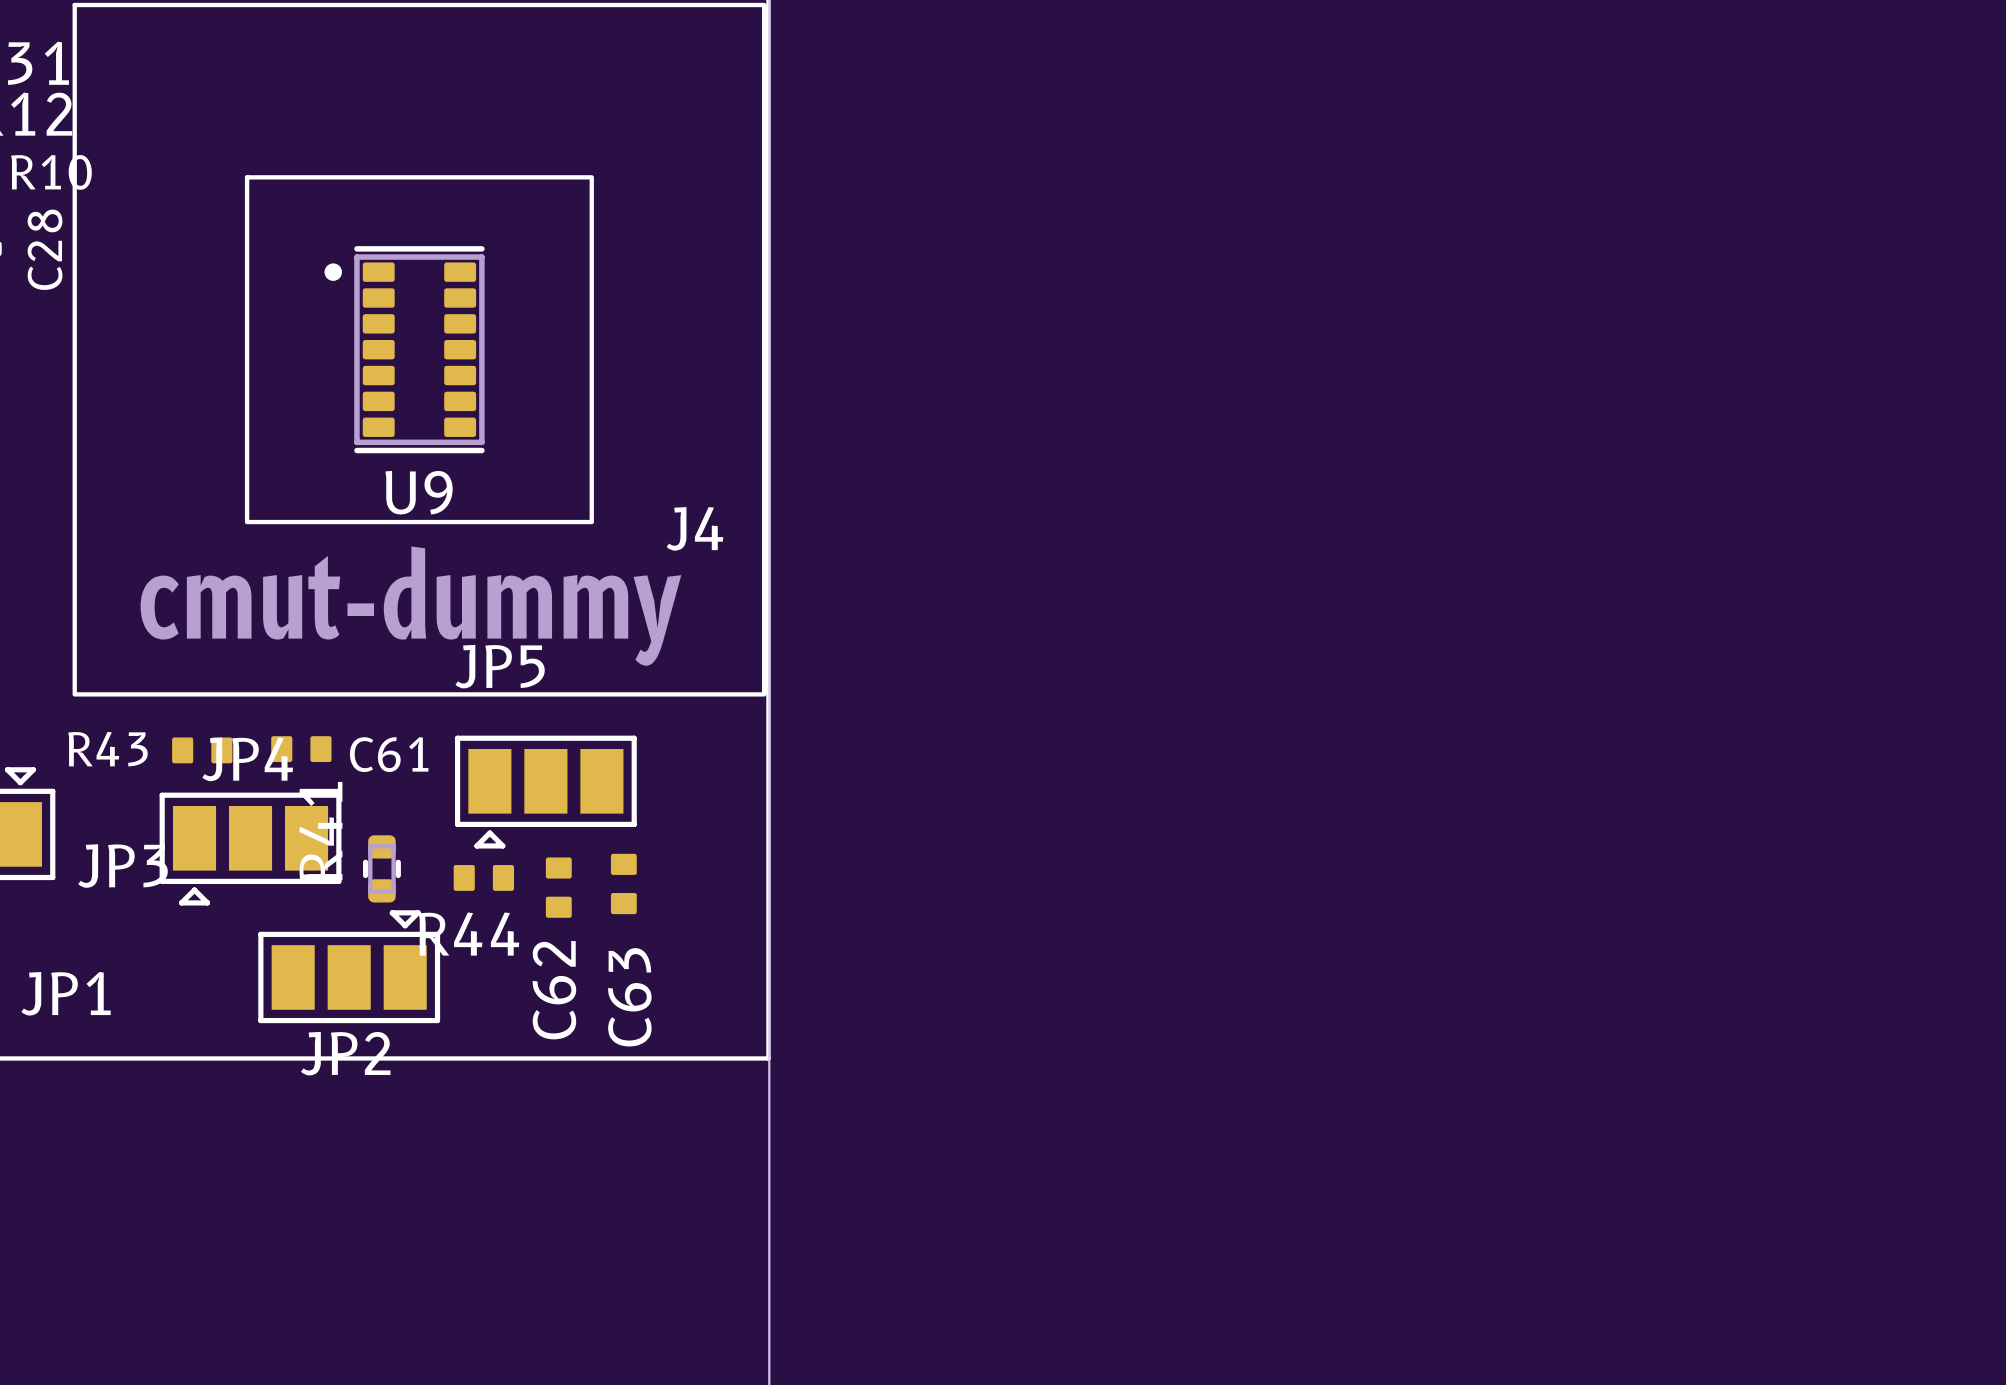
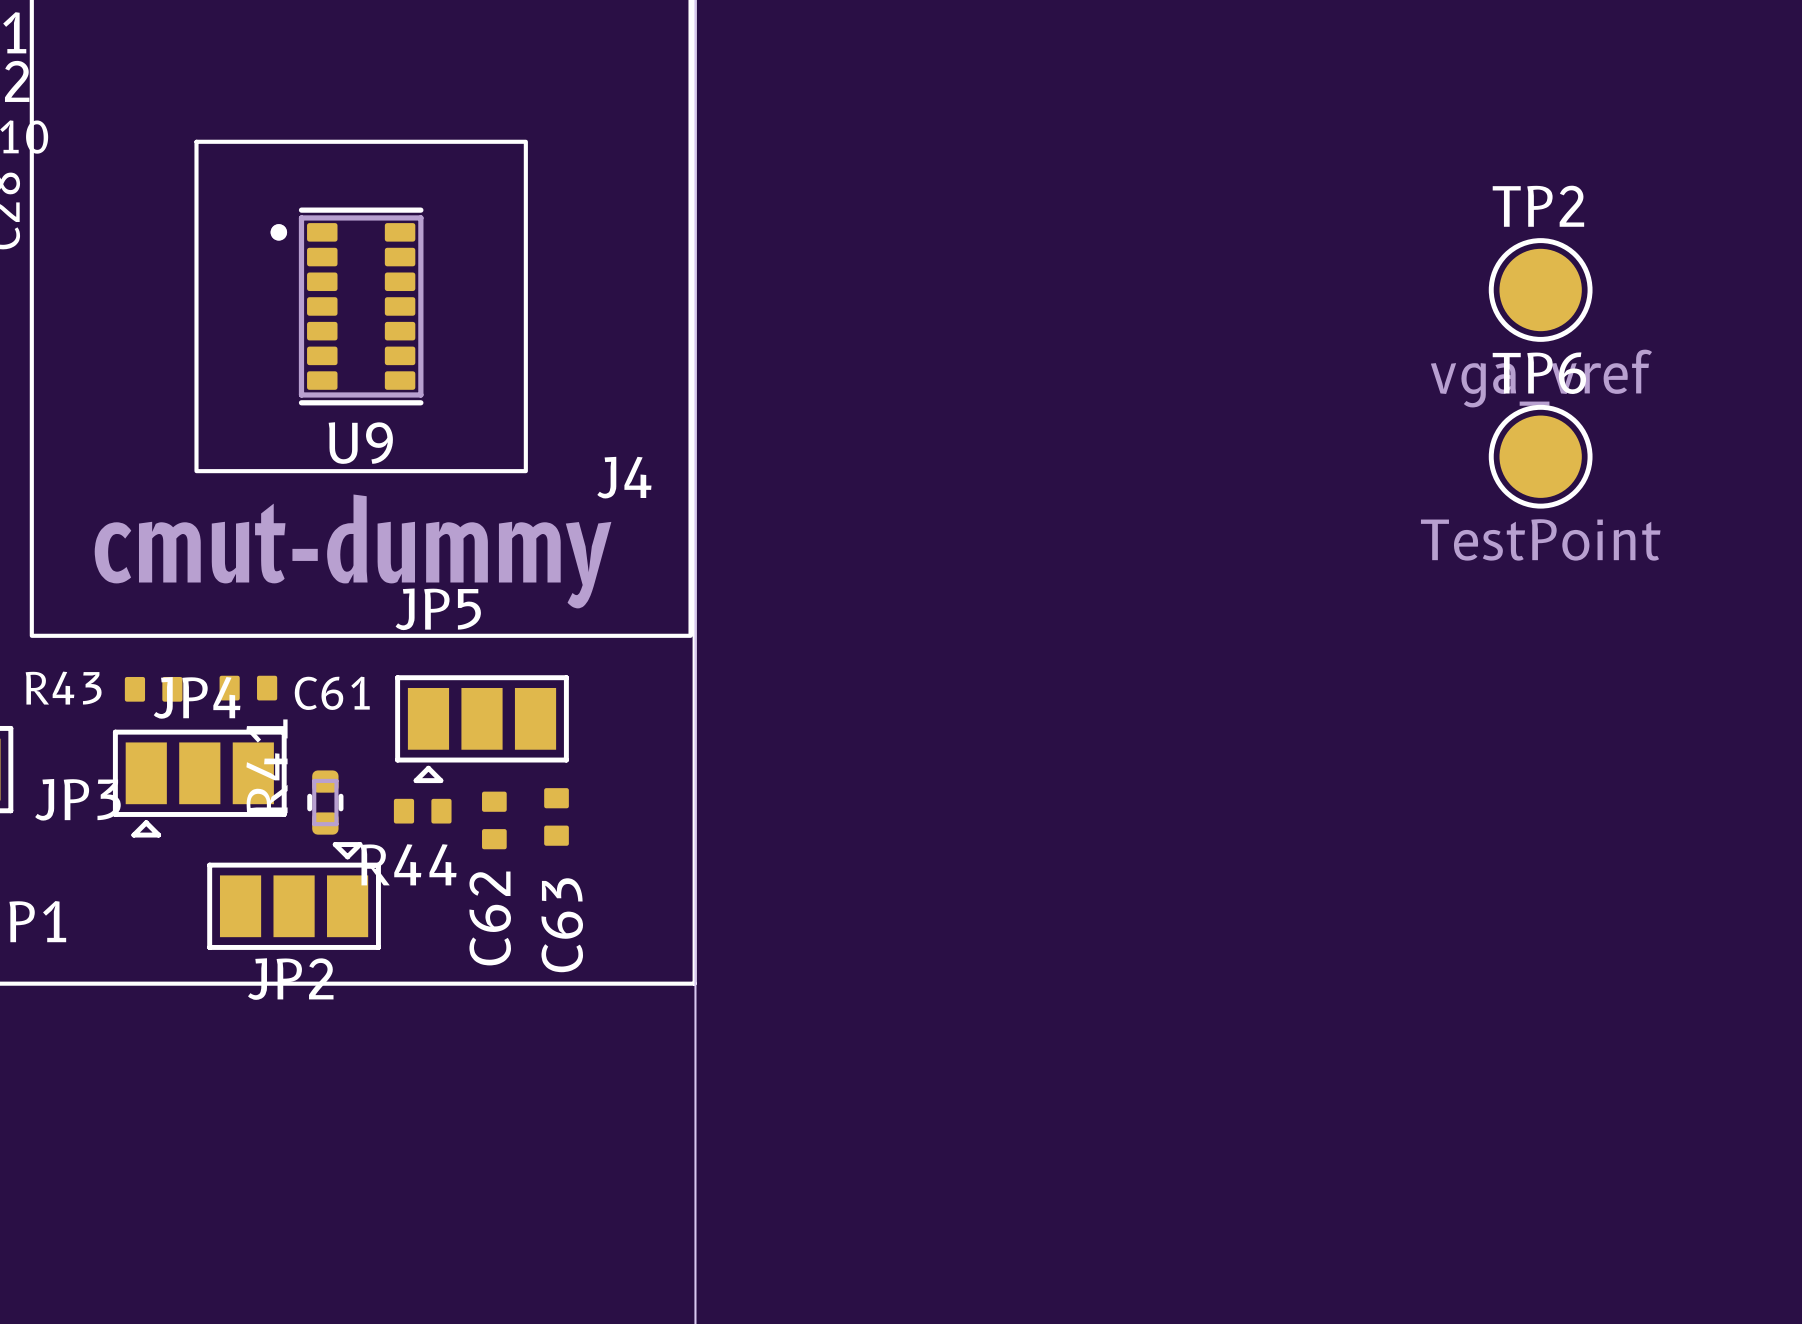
TP2: none -> vga_vref (1540, 289)
TP6: none -> TestPoint (1540, 456)

